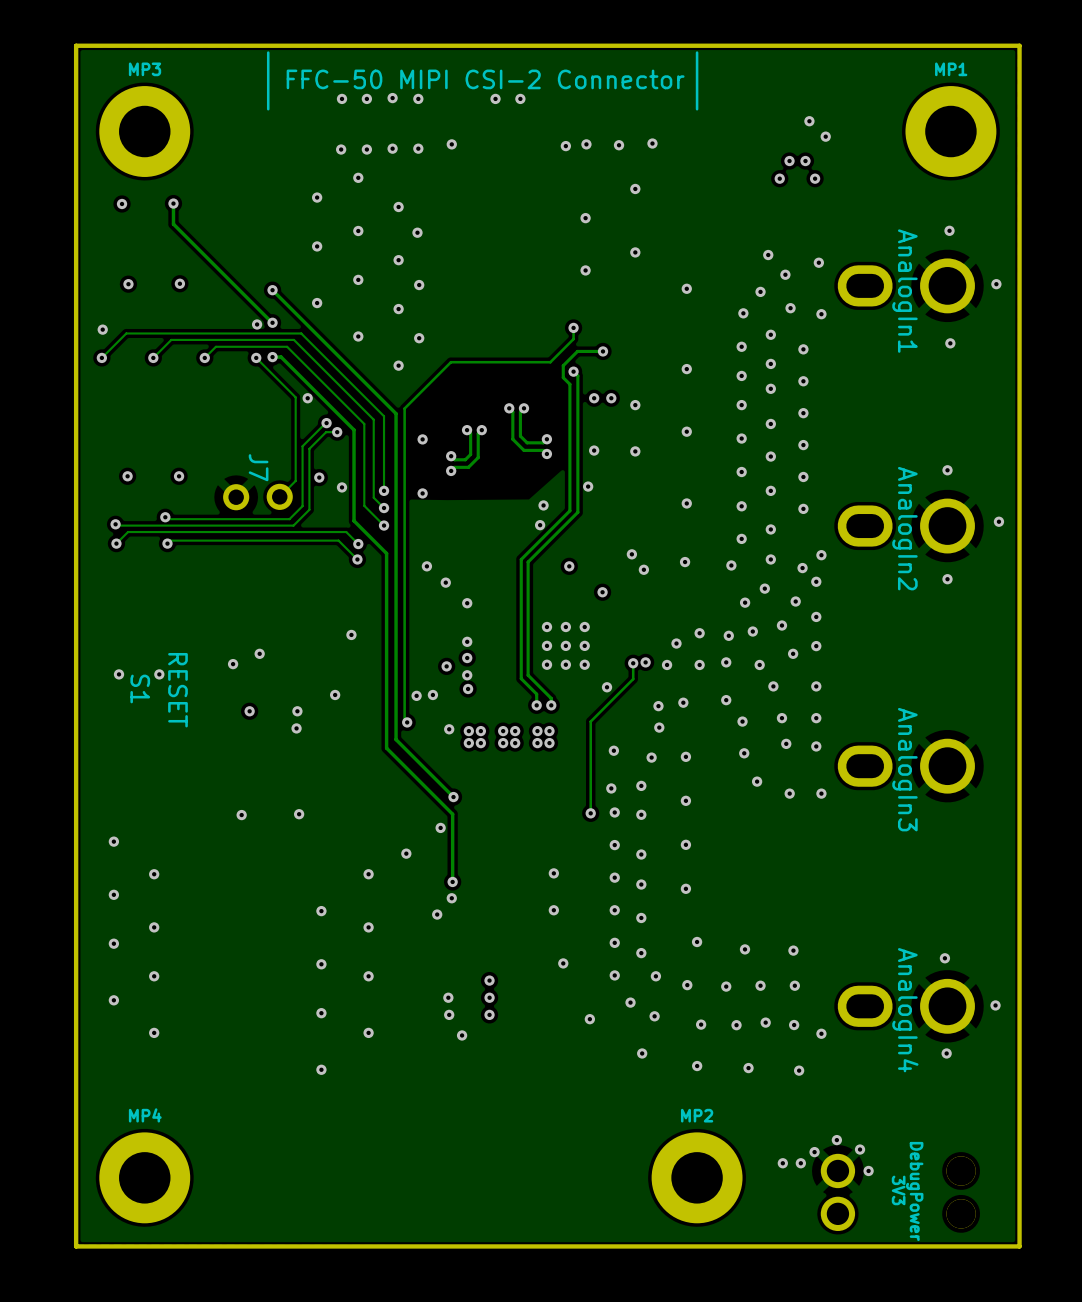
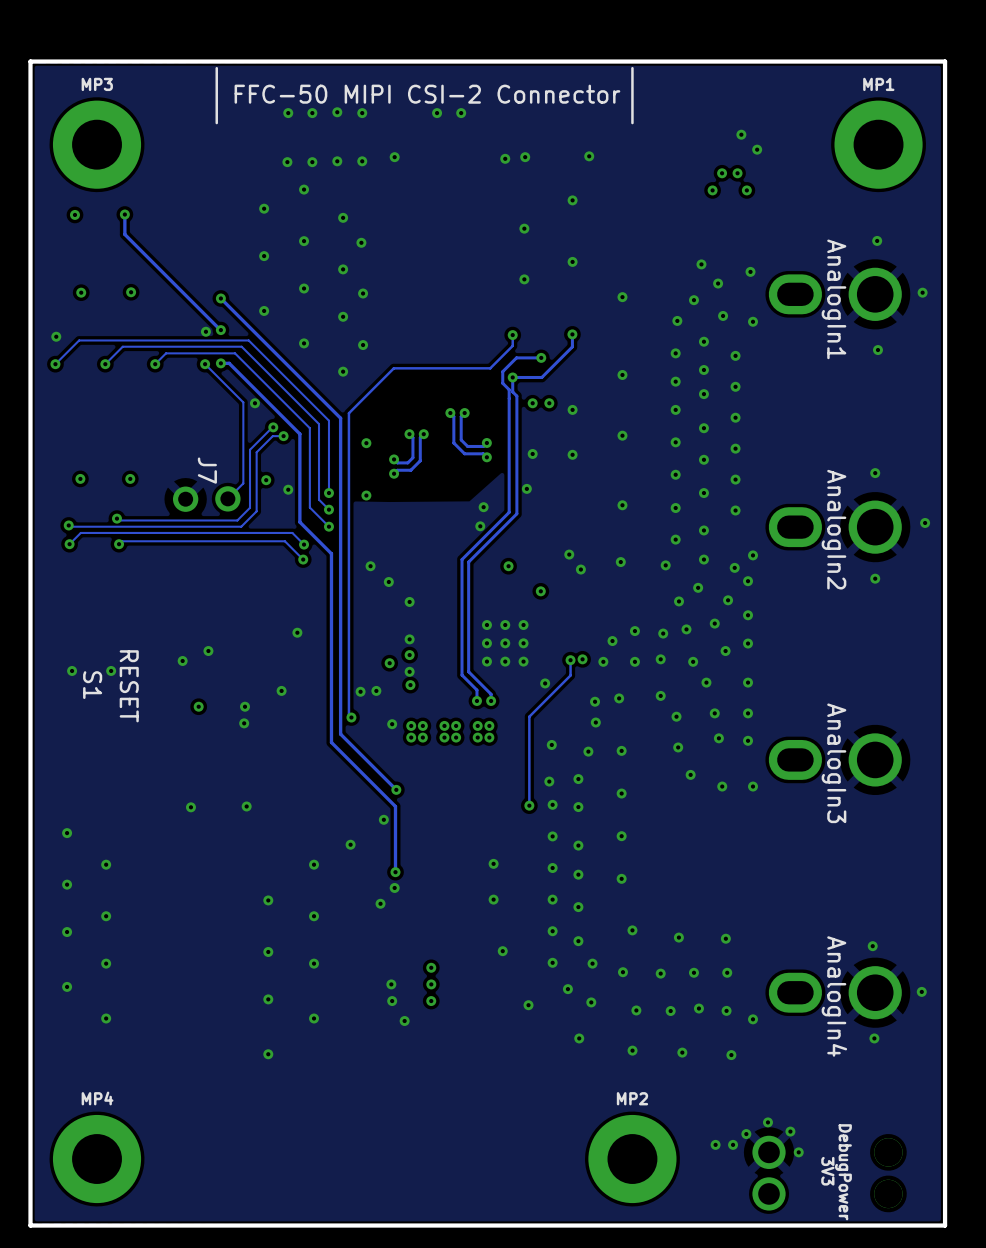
via: (619, 145) -> none
via: none -> (572, 334)
track: (573, 371) (577, 375) (577, 390) -> (572, 334) (572, 346) (541, 377) (512, 377) (512, 391) (516, 396)

